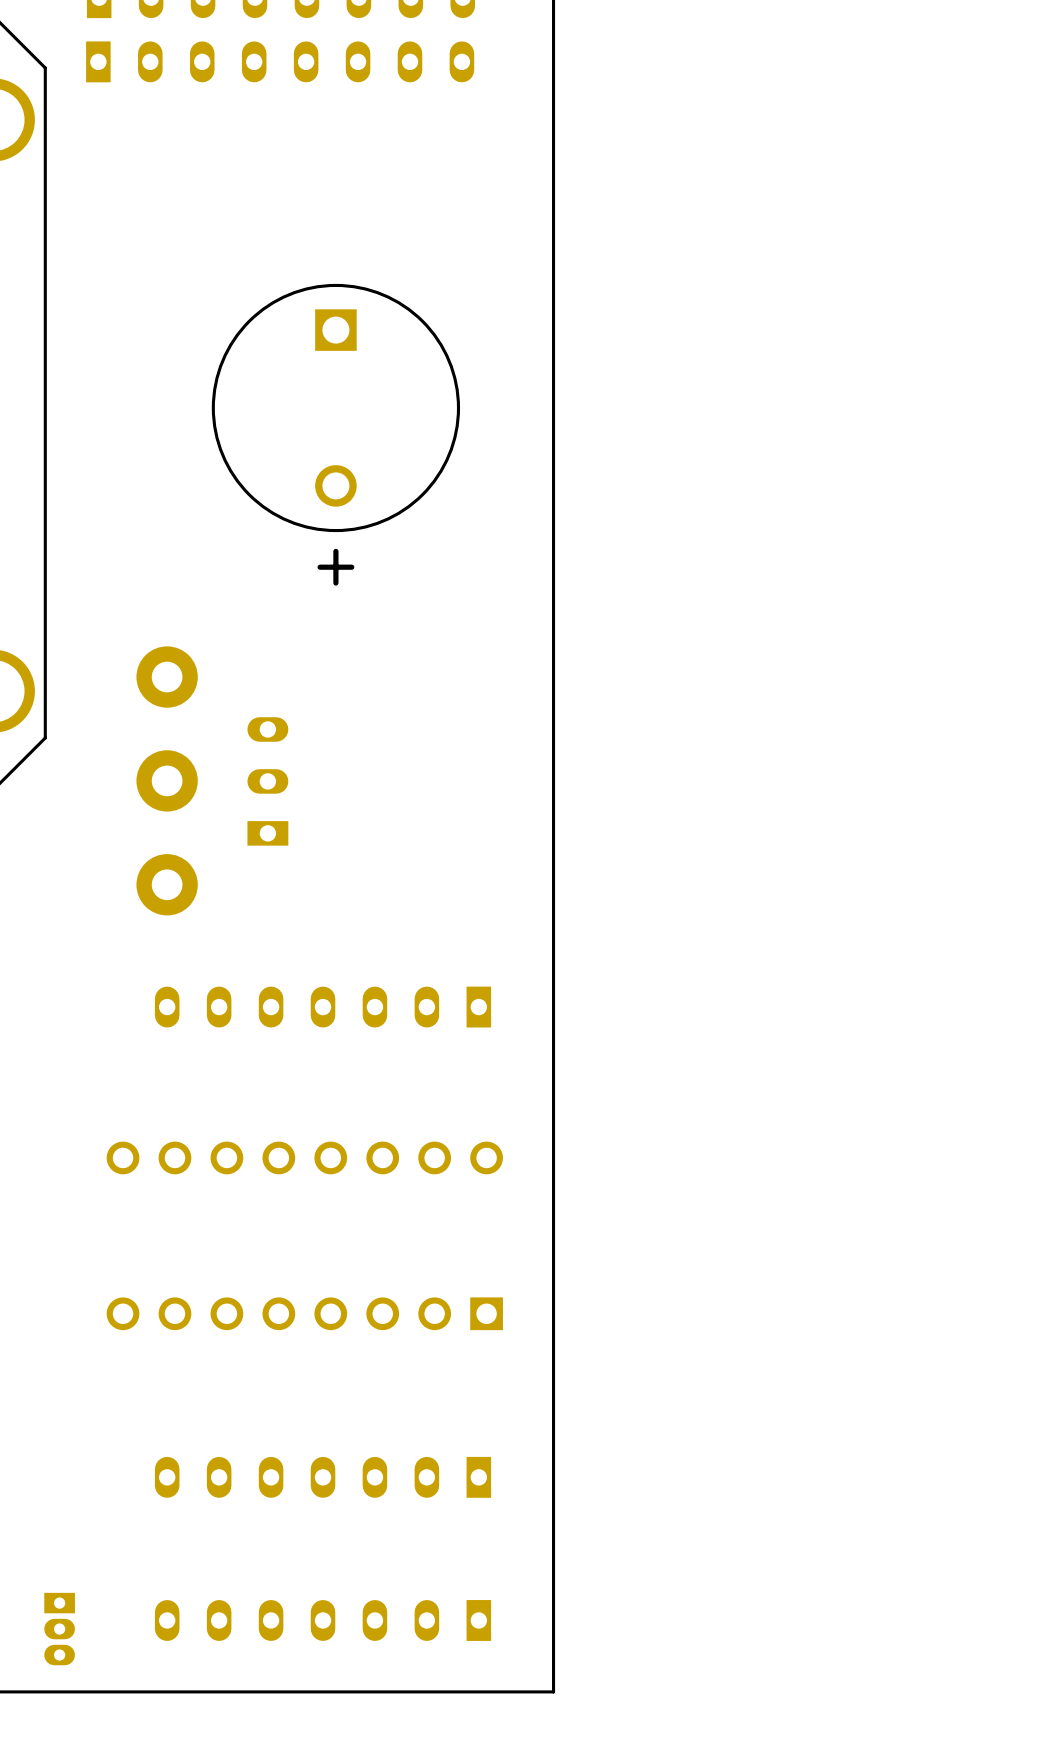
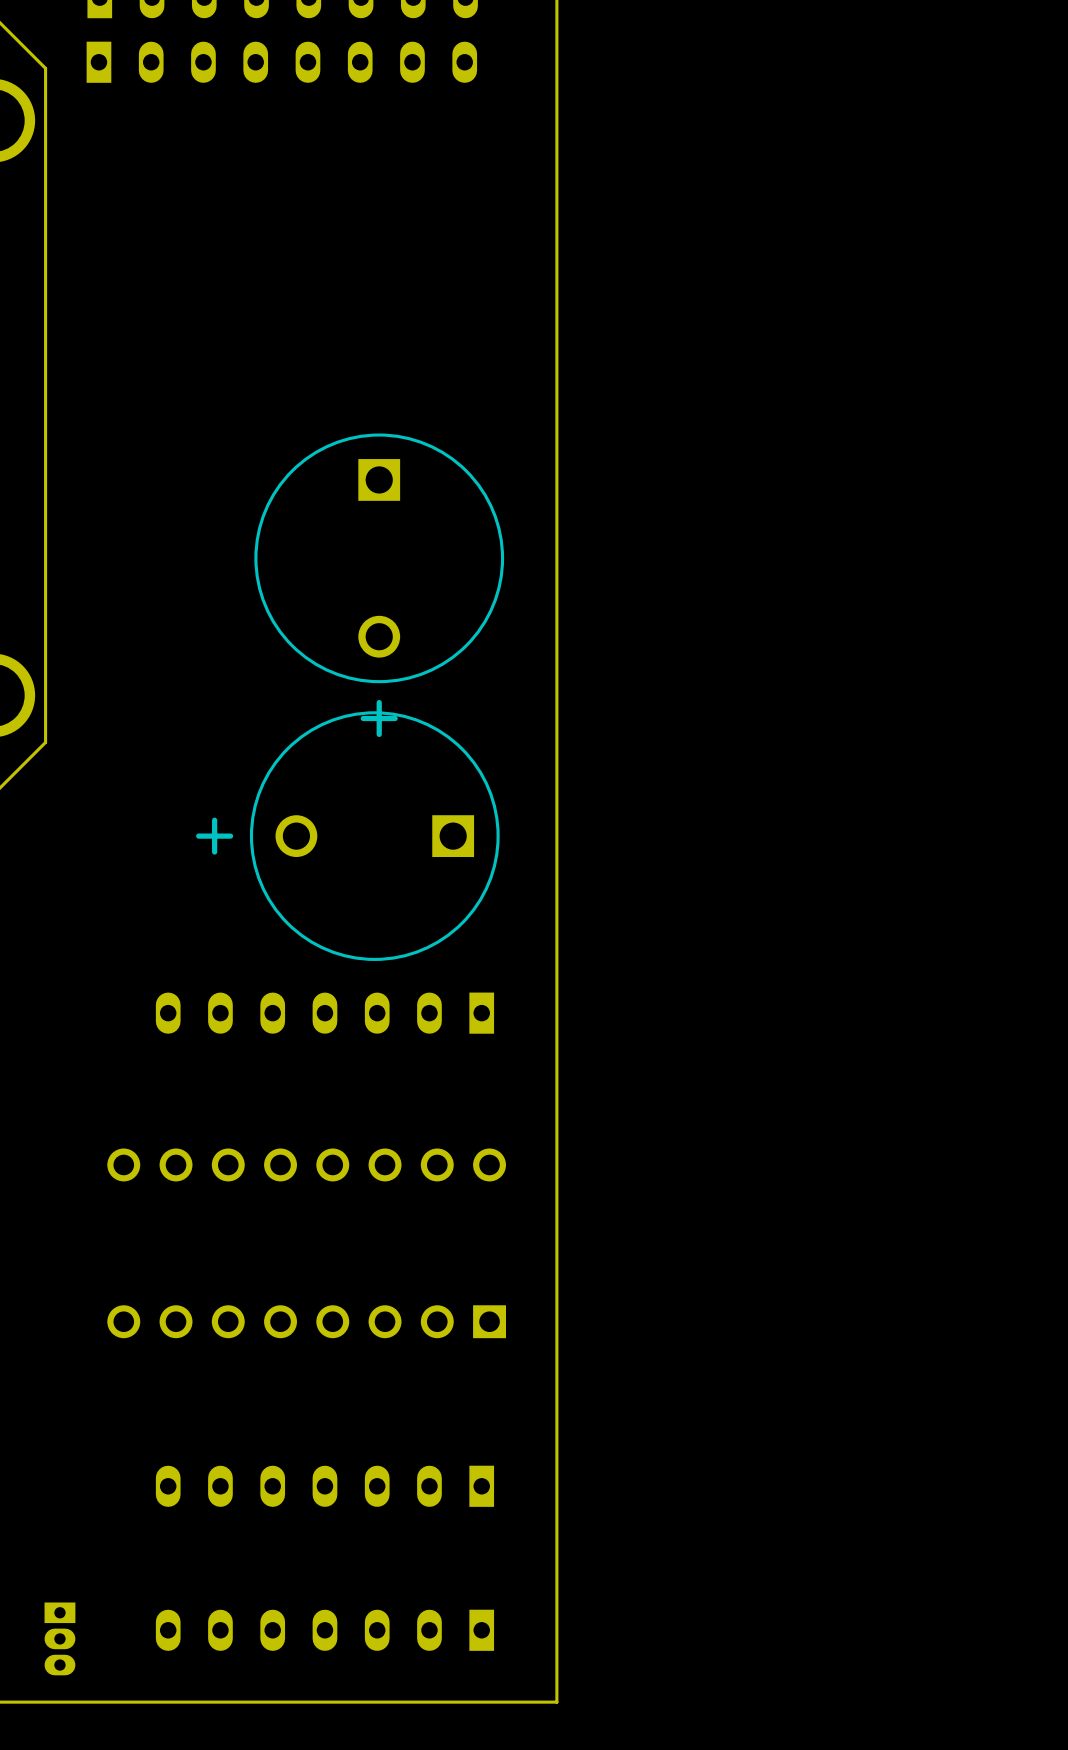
part position: (335, 407) -> (379, 558)
part: (167, 780) -> none
part: (267, 781) -> none
part: none -> (374, 836)

